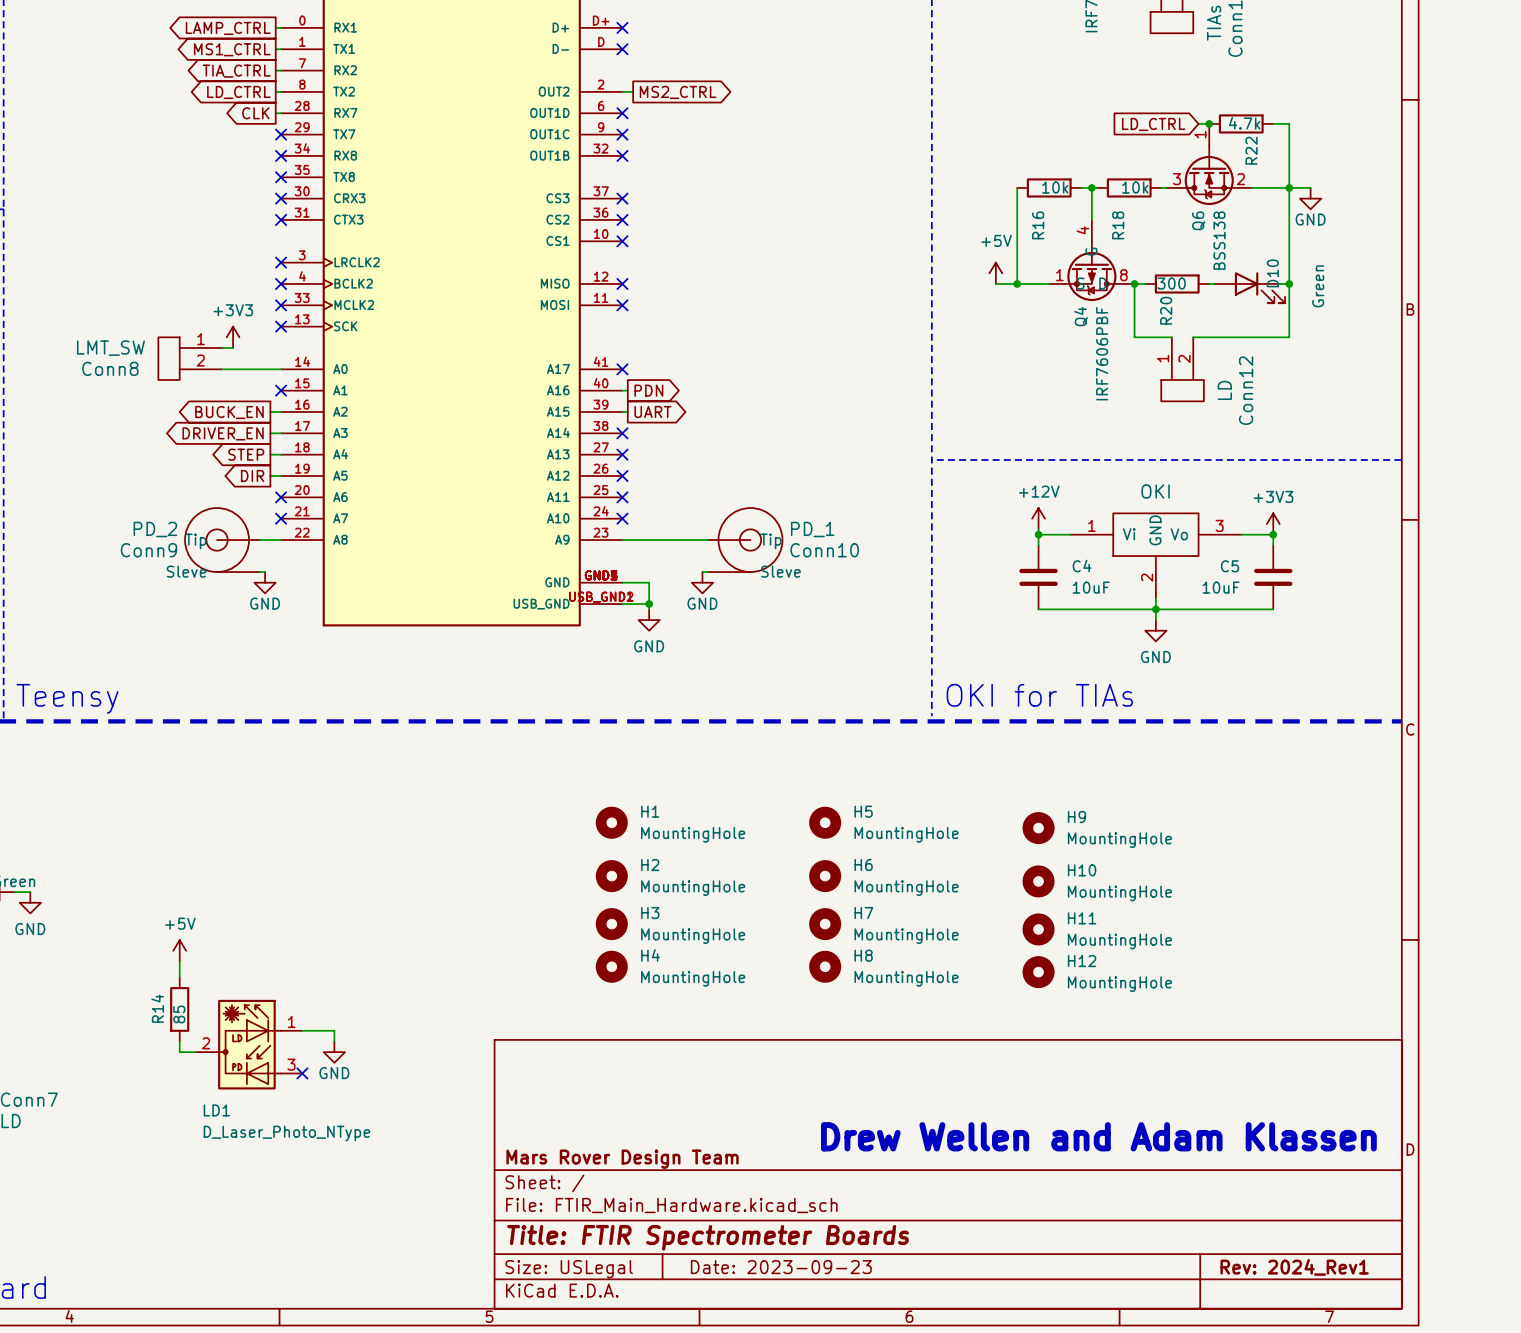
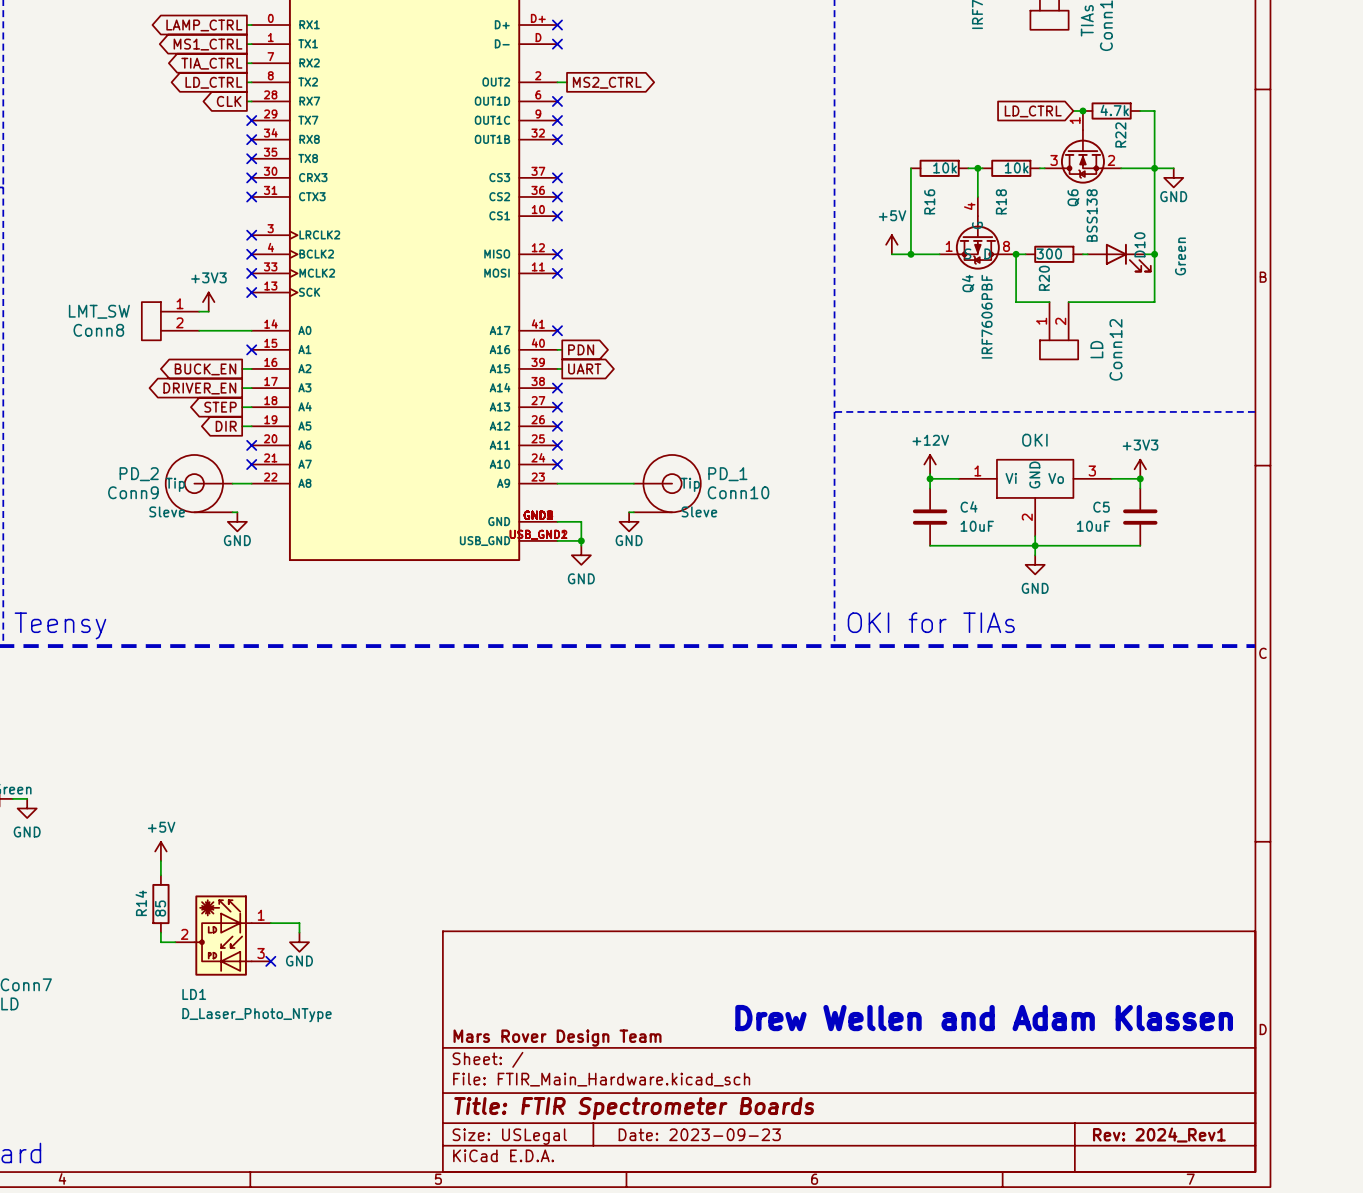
H1: MountingHole (611, 822) -> none
H5: MountingHole (825, 822) -> none
H9: MountingHole (1038, 828) -> none
H2: MountingHole (611, 876) -> none
H6: MountingHole (825, 876) -> none
H10: MountingHole (1038, 881) -> none
H3: MountingHole (611, 924) -> none
H7: MountingHole (825, 924) -> none
H11: MountingHole (1038, 929) -> none
H4: MountingHole (611, 966) -> none
H8: MountingHole (825, 966) -> none
H12: MountingHole (1038, 972) -> none

